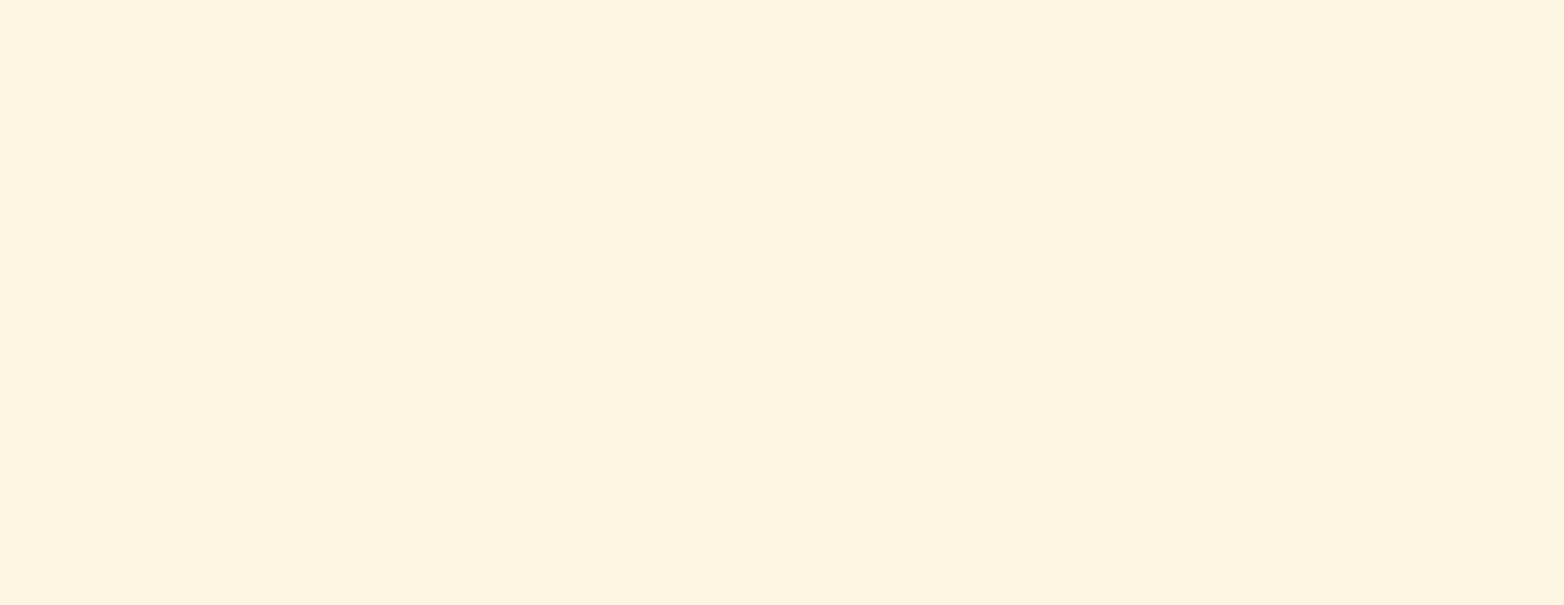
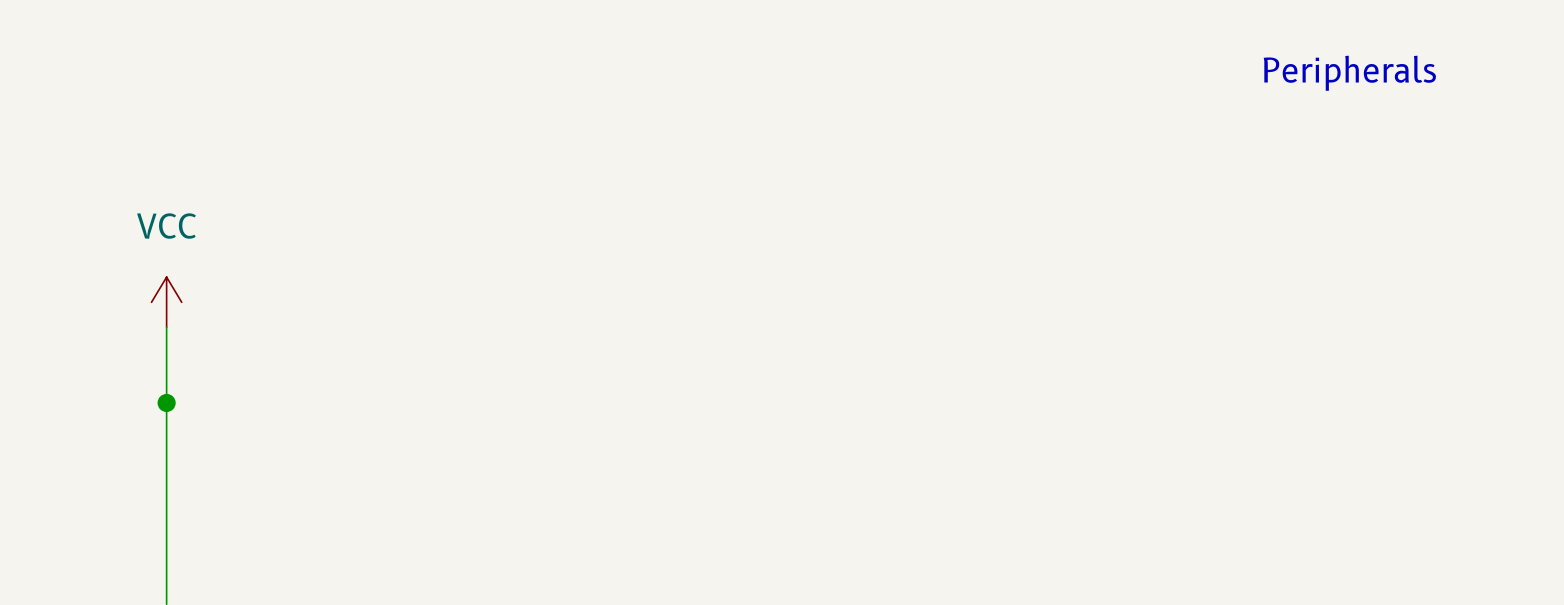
text: none -> Peripherals (1349, 73)
power symbol: none -> VCC (166, 302)
wire: none -> (166, 327) (166, 604)
junction: none -> (166, 402)

